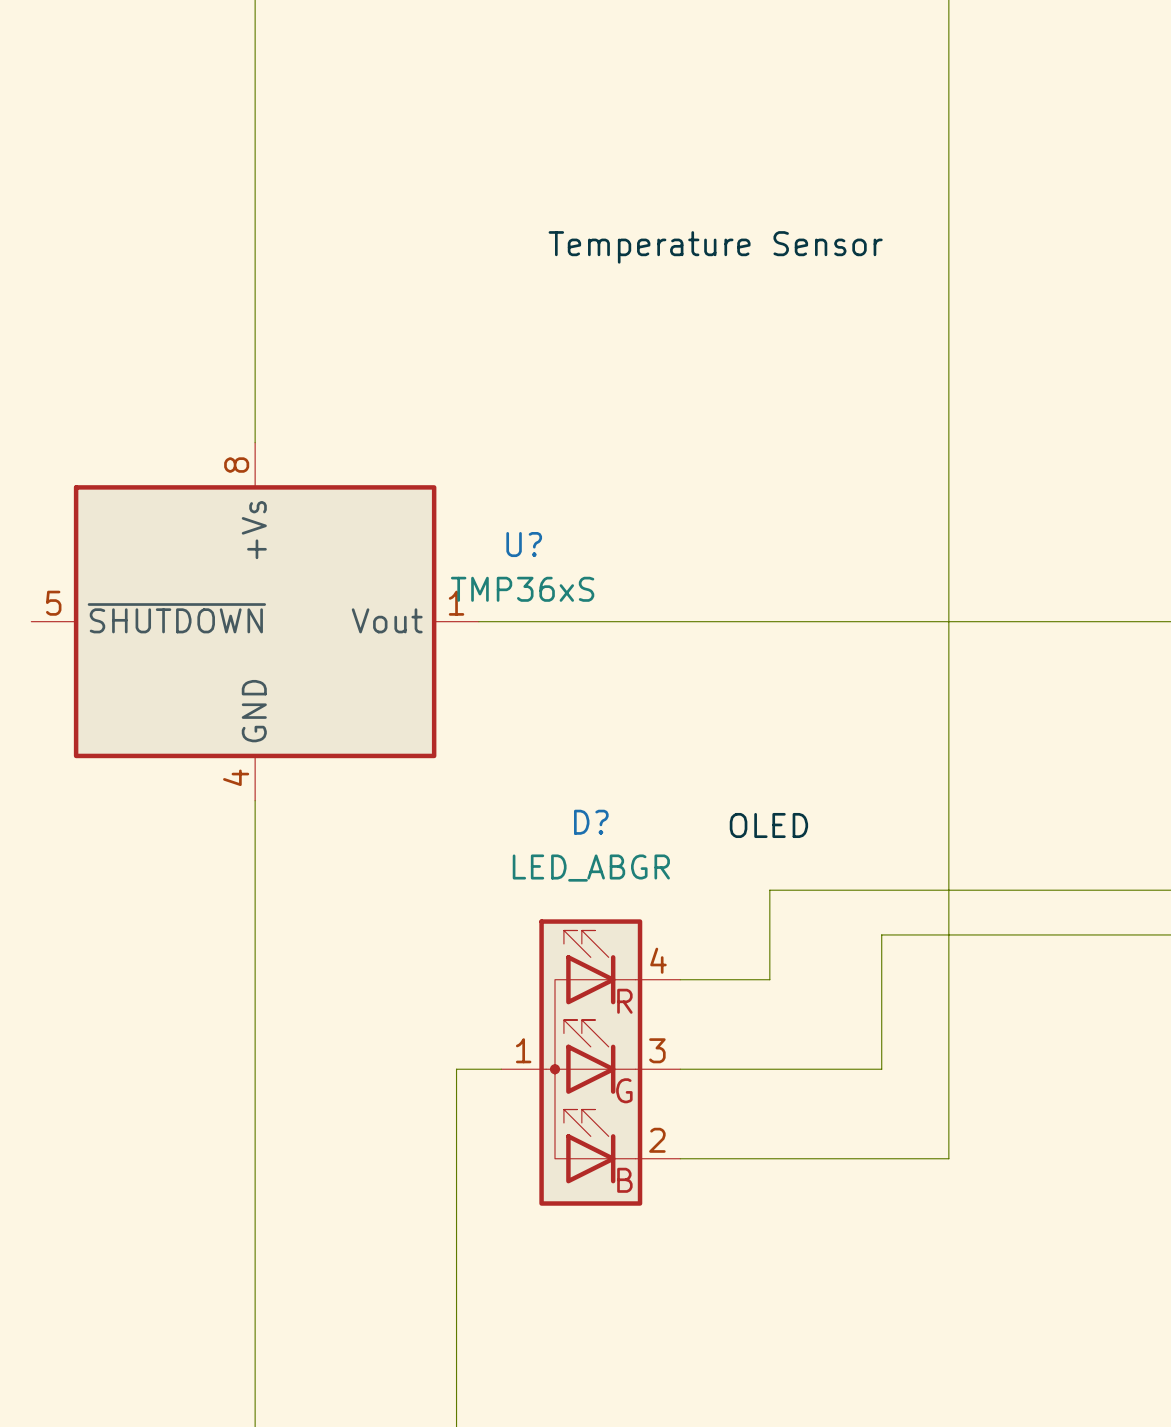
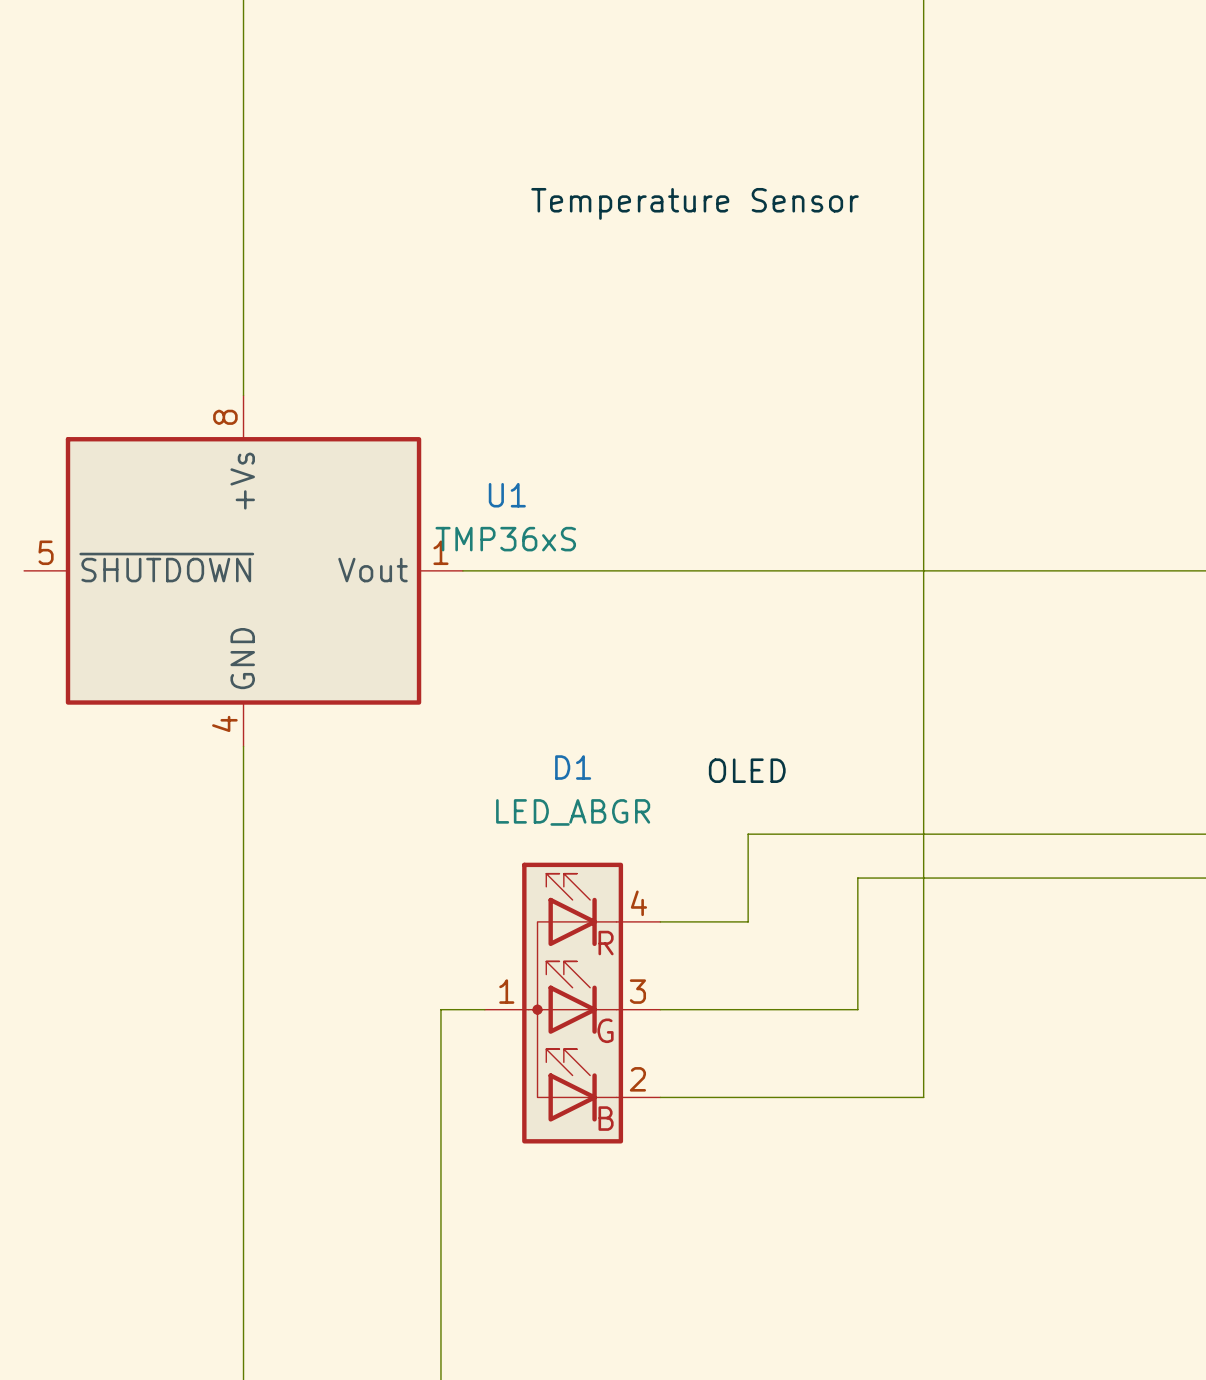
U? name: U? (524, 544) -> U1 (507, 495)
D? name: D? (591, 822) -> D1 (573, 767)

